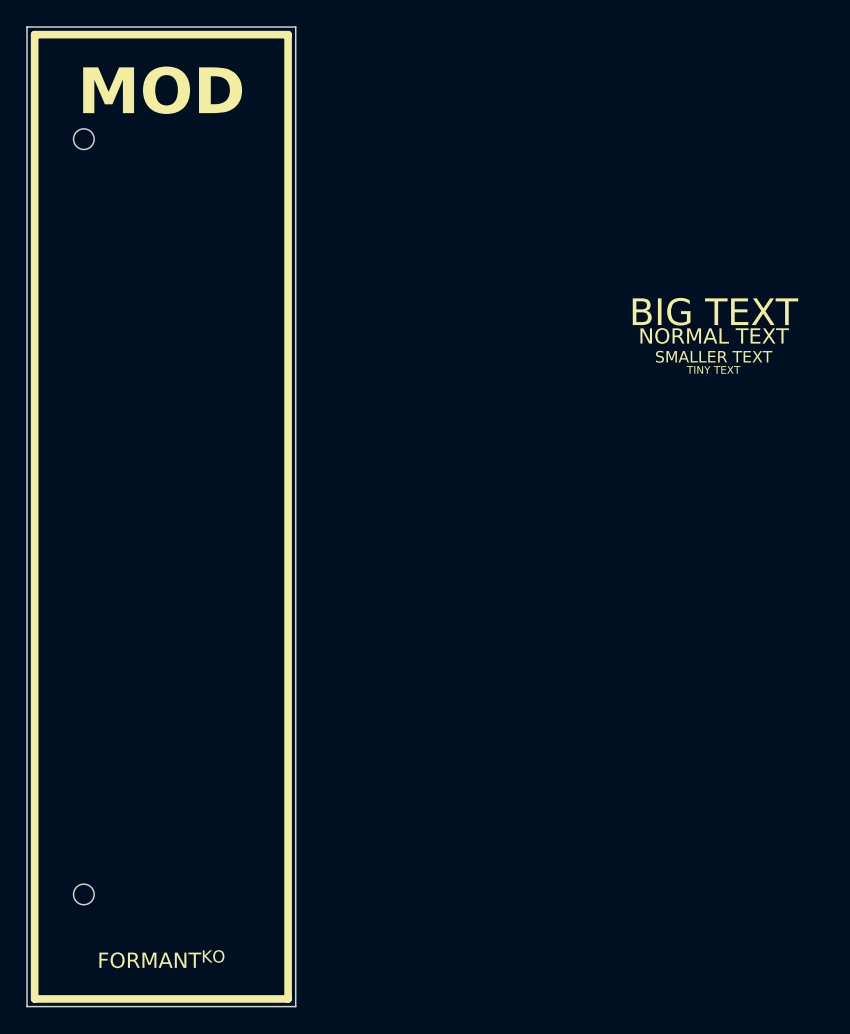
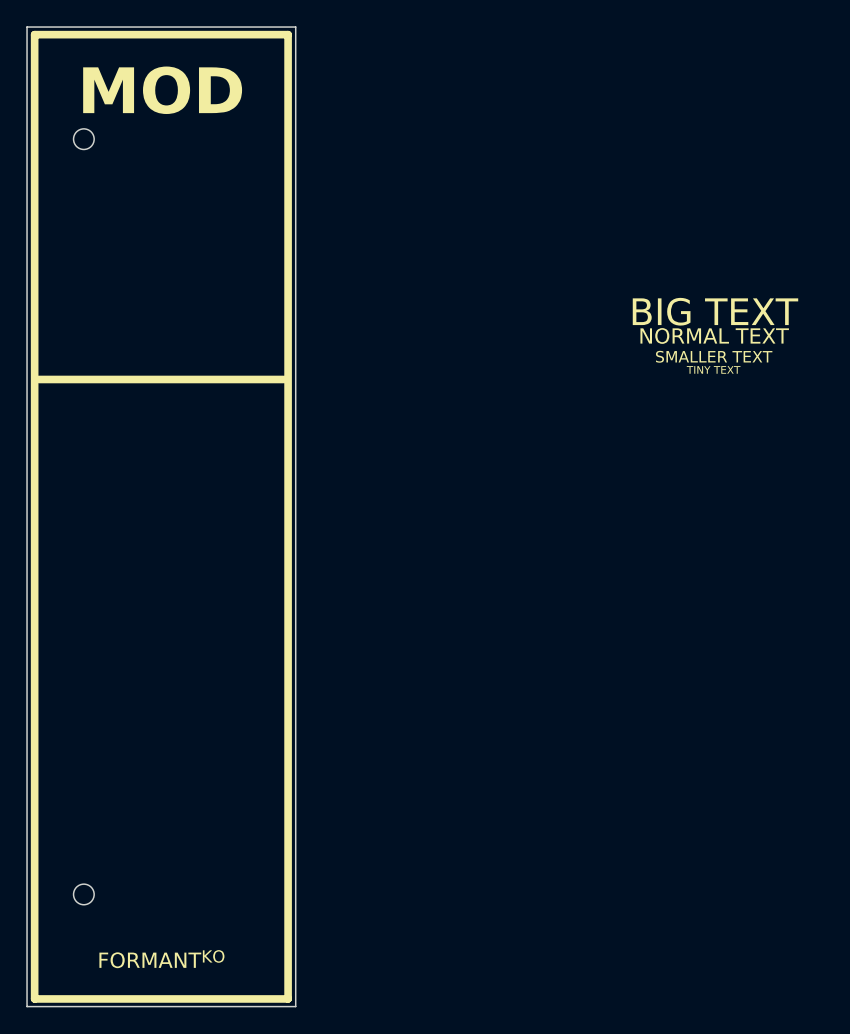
line: none -> (39, 379) (283, 379)

